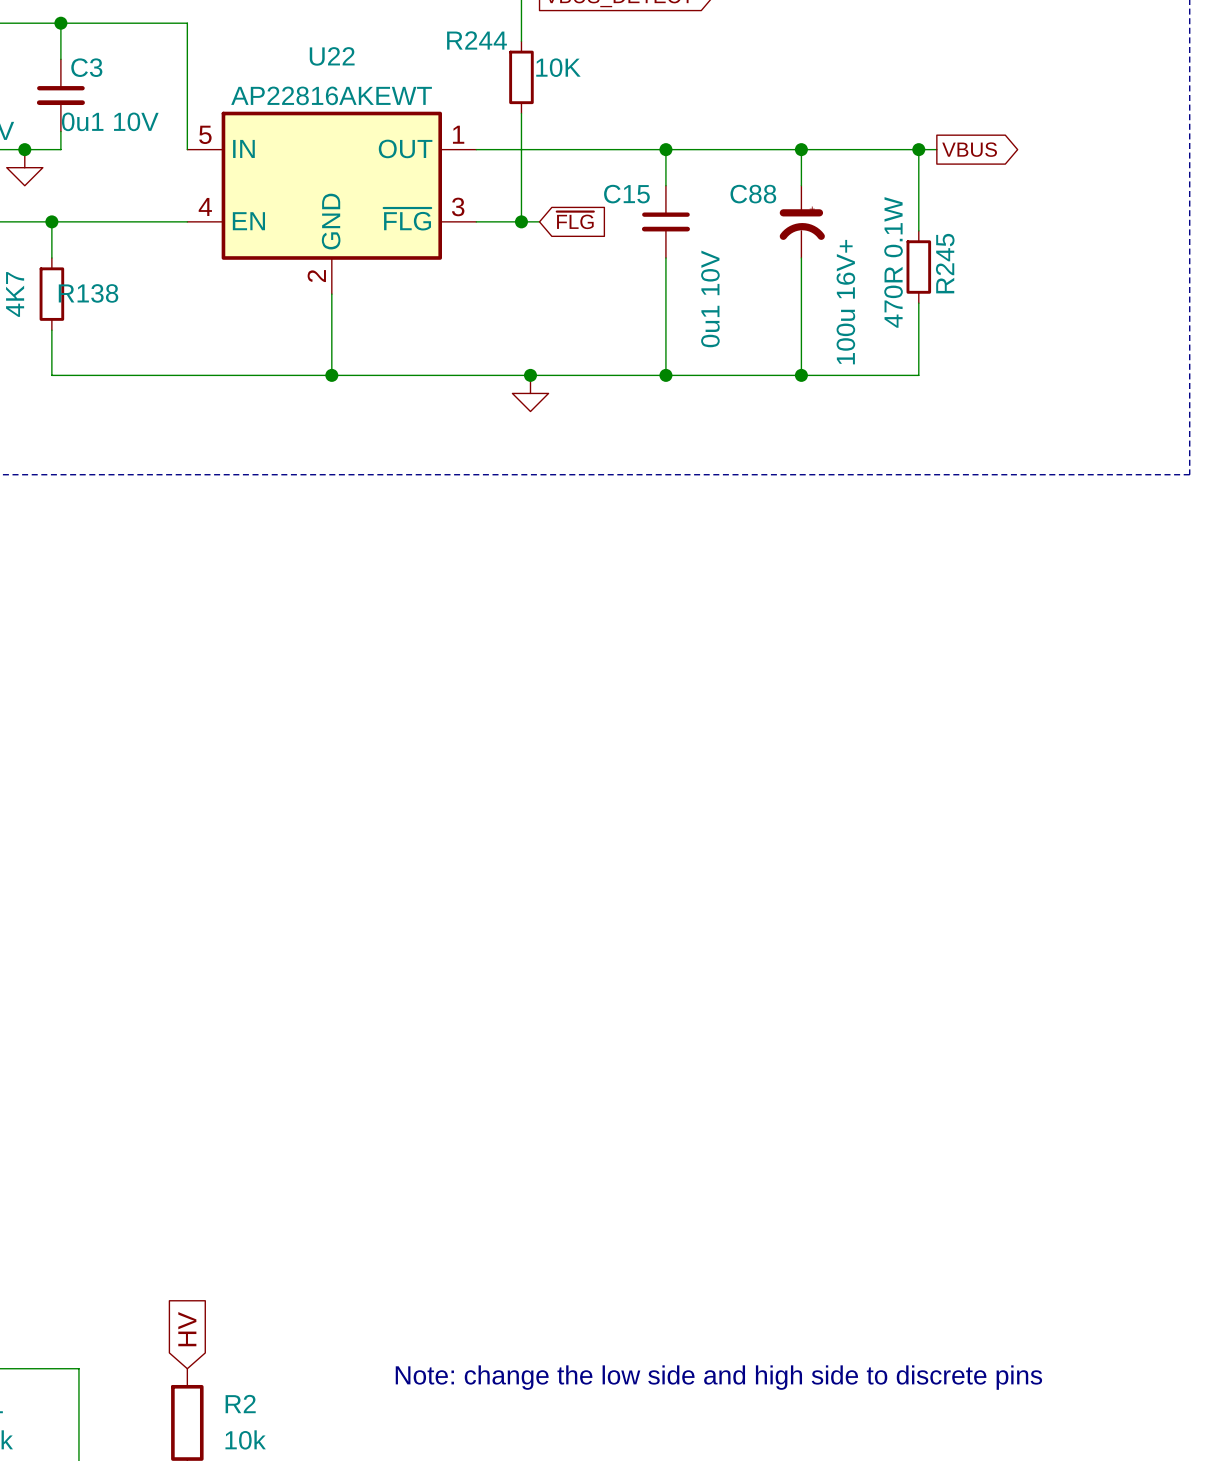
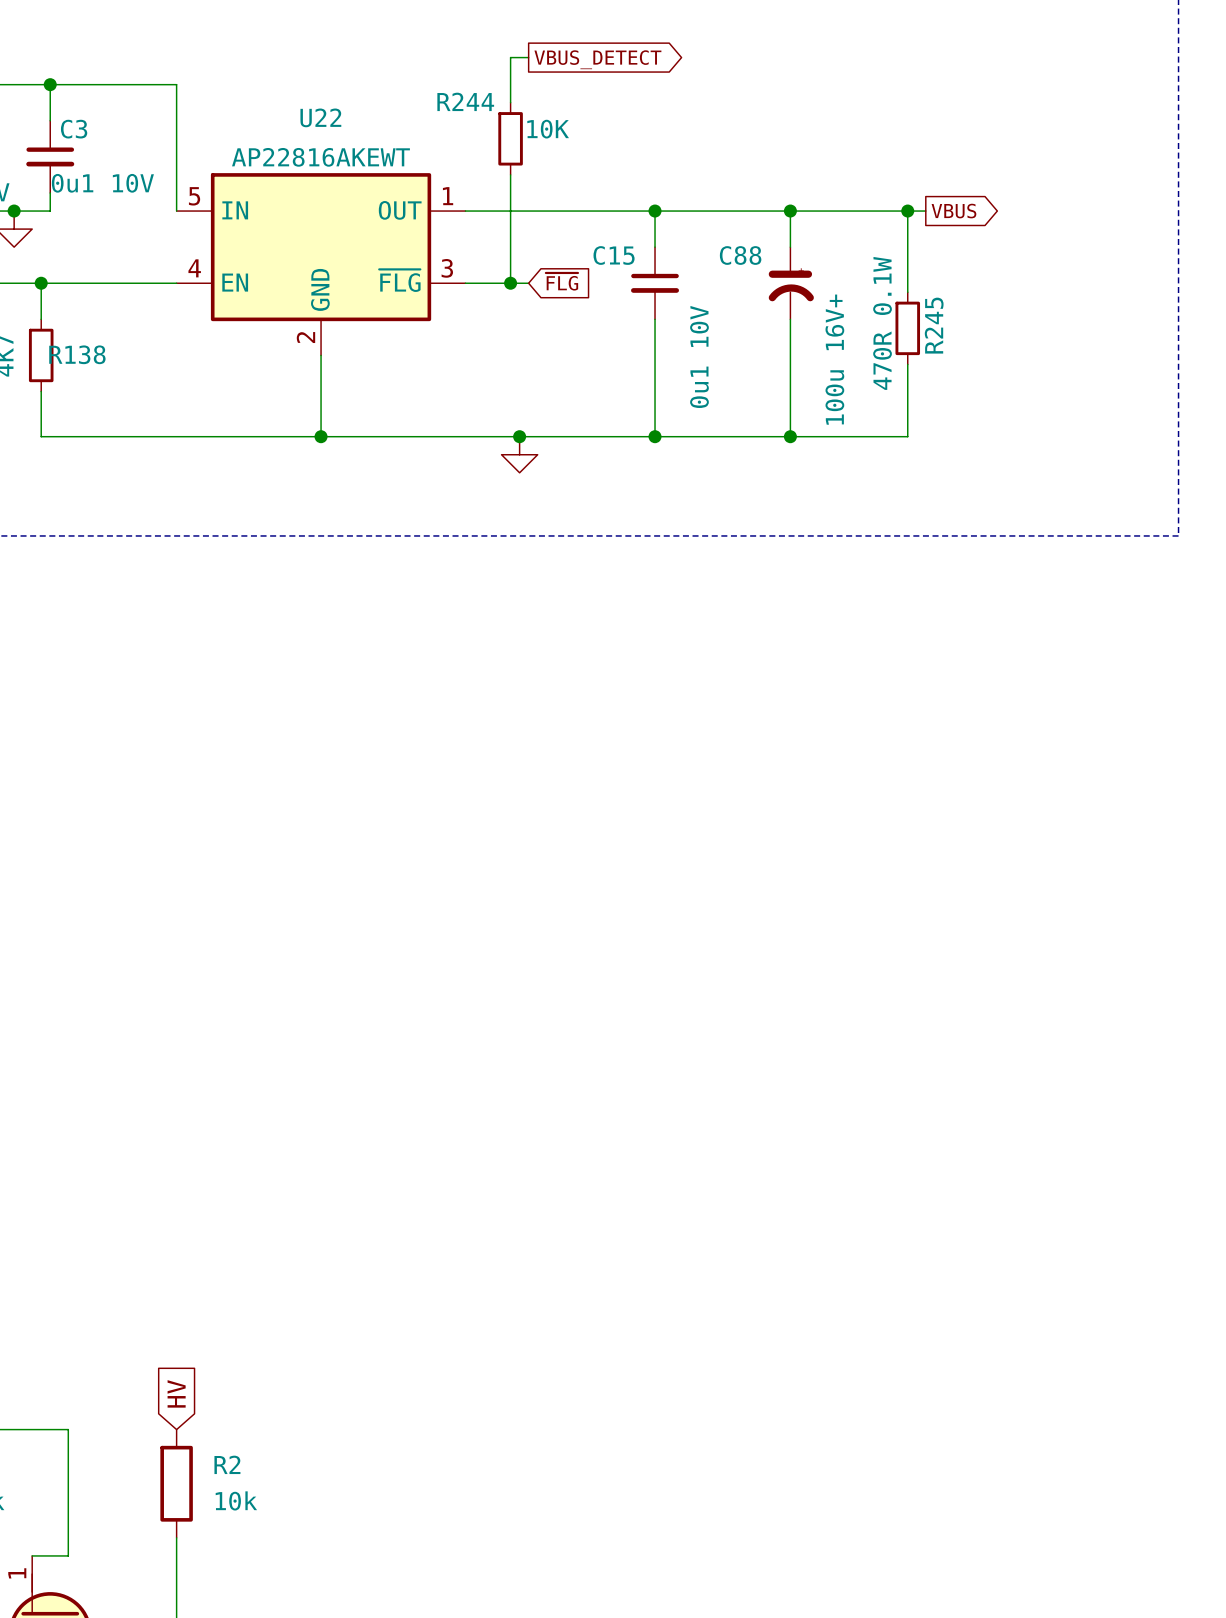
text: Note: change the low side and high side to discrete pins (718, 1377) -> none

